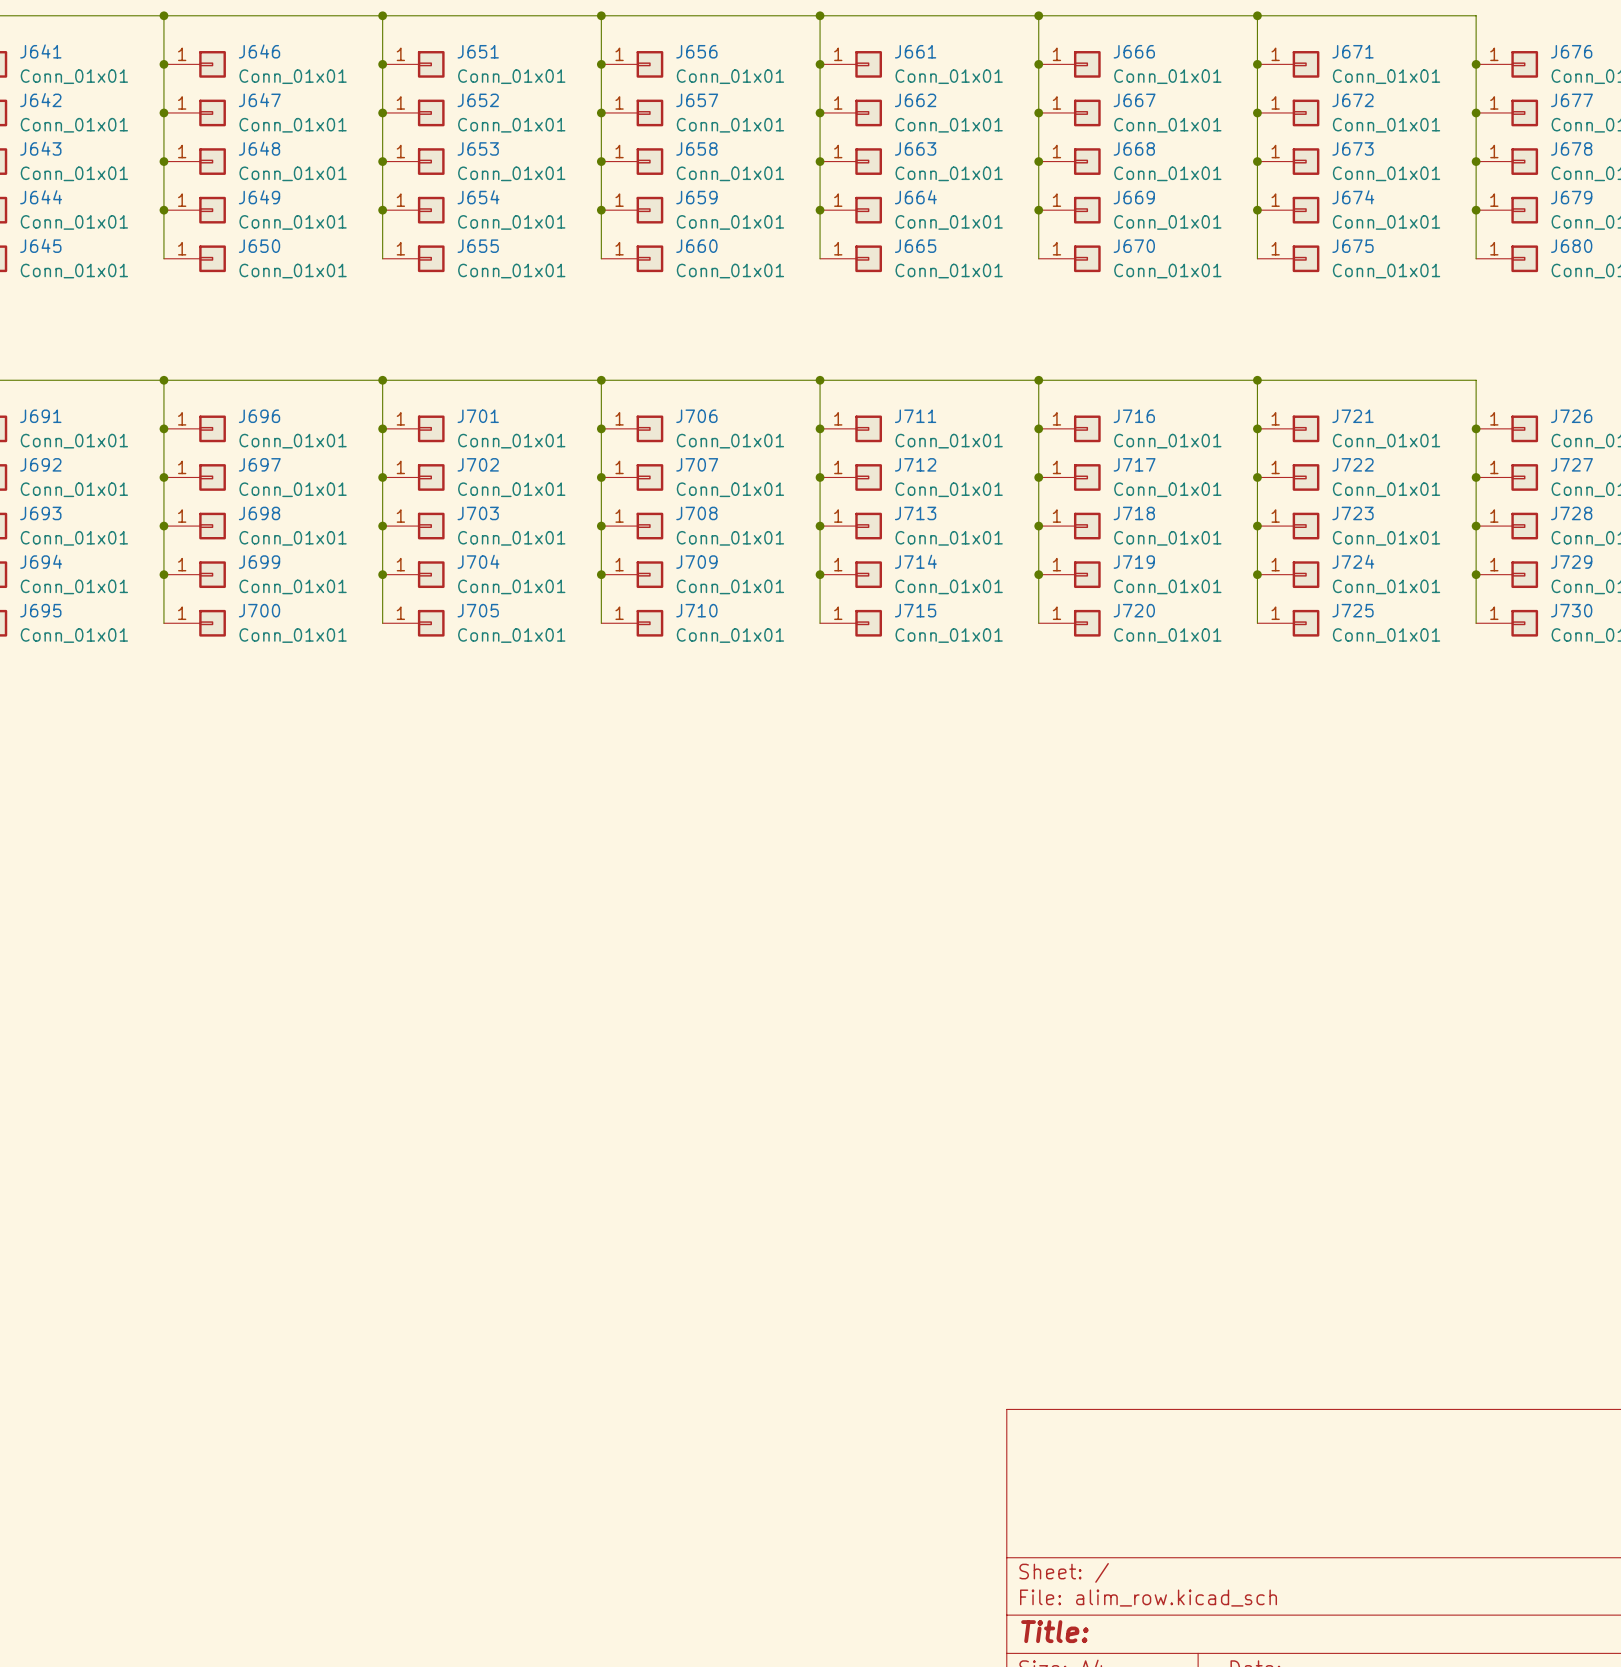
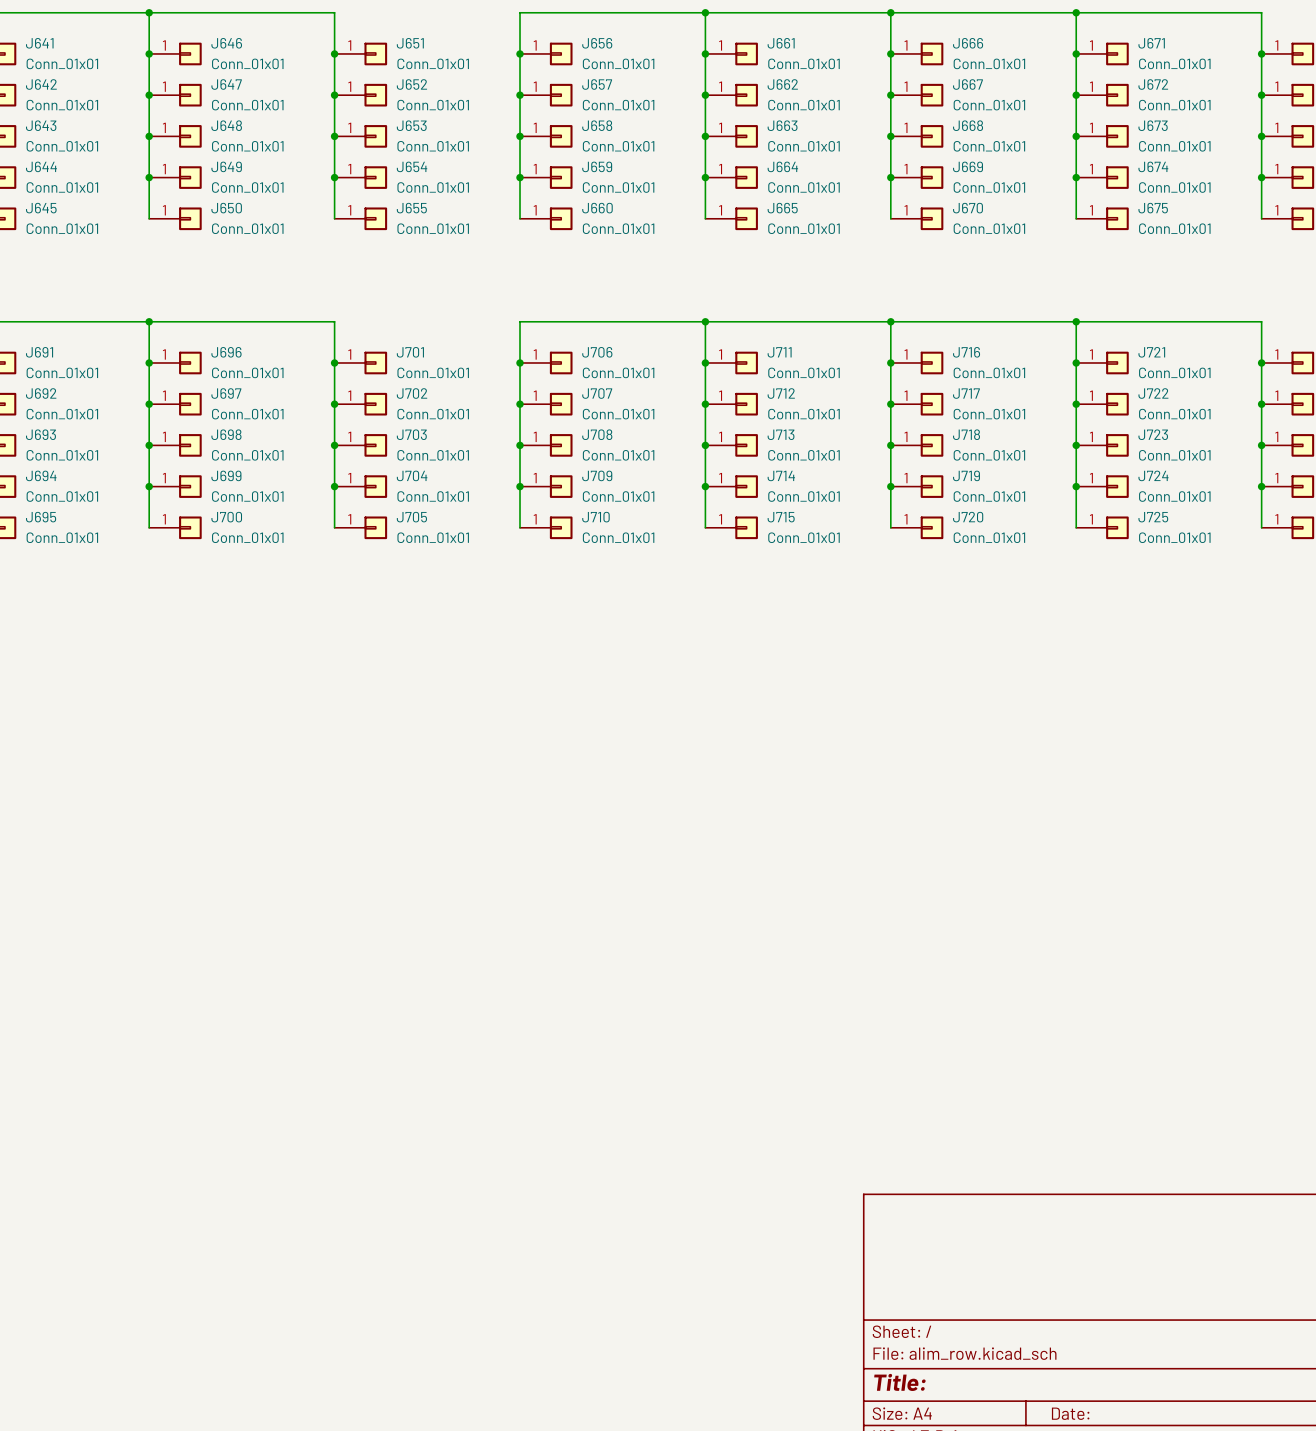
wire: (382, 15) (601, 15) -> none
junction: (382, 15) -> none
junction: (601, 15) -> none
wire: (382, 380) (601, 380) -> none
junction: (382, 380) -> none
junction: (601, 380) -> none

